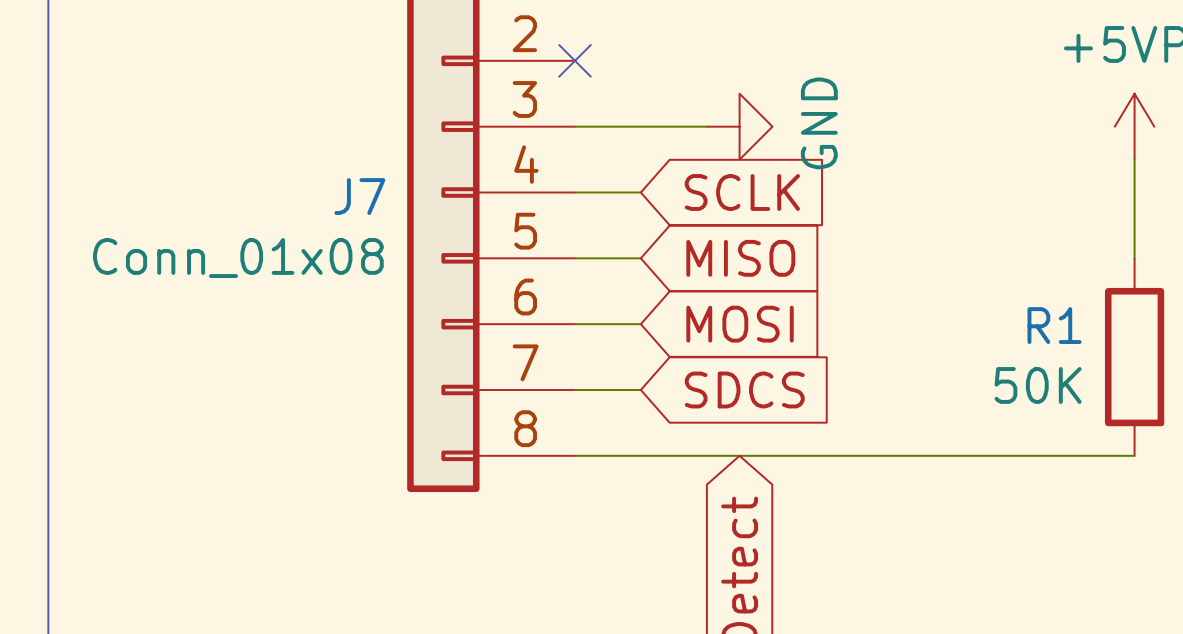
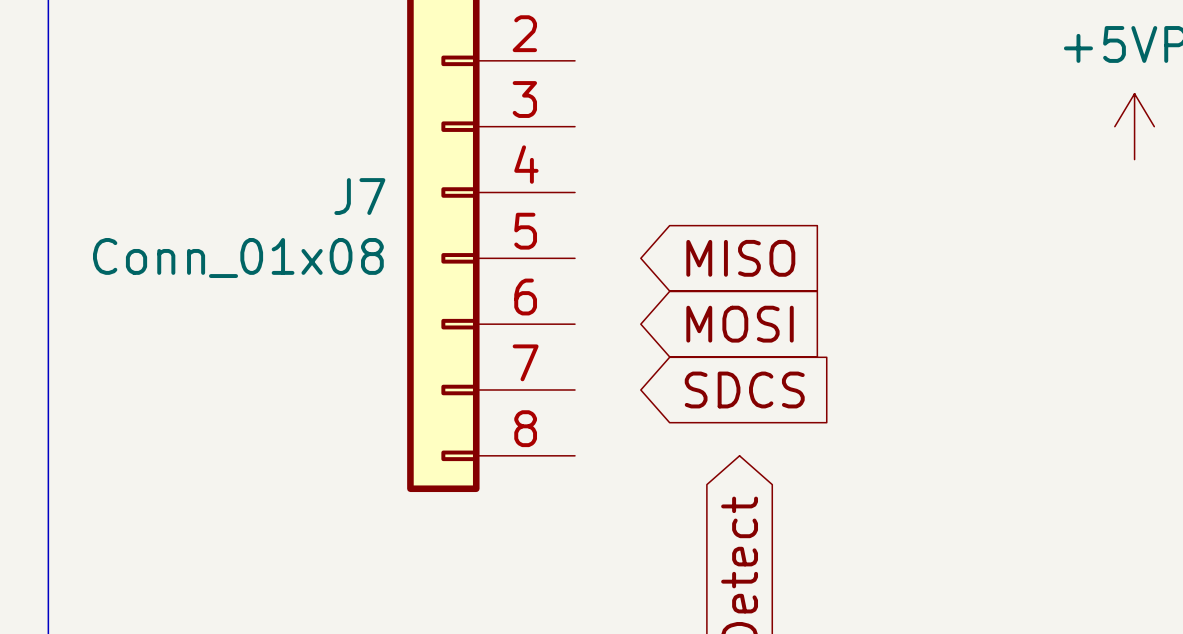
no-connect mark: (575, 60) -> none
wire: (575, 126) (706, 126) -> none
power symbol: GND (739, 126) -> none
wire: (1134, 159) (1134, 258) -> none
wire: (575, 192) (640, 192) -> none
global label: SCLK (742, 192) -> none
wire: (575, 258) (640, 258) -> none
wire: (575, 324) (640, 324) -> none
R1: 50K (1134, 357) -> none
wire: (575, 389) (640, 389) -> none
wire: (575, 455) (1134, 455) -> none

